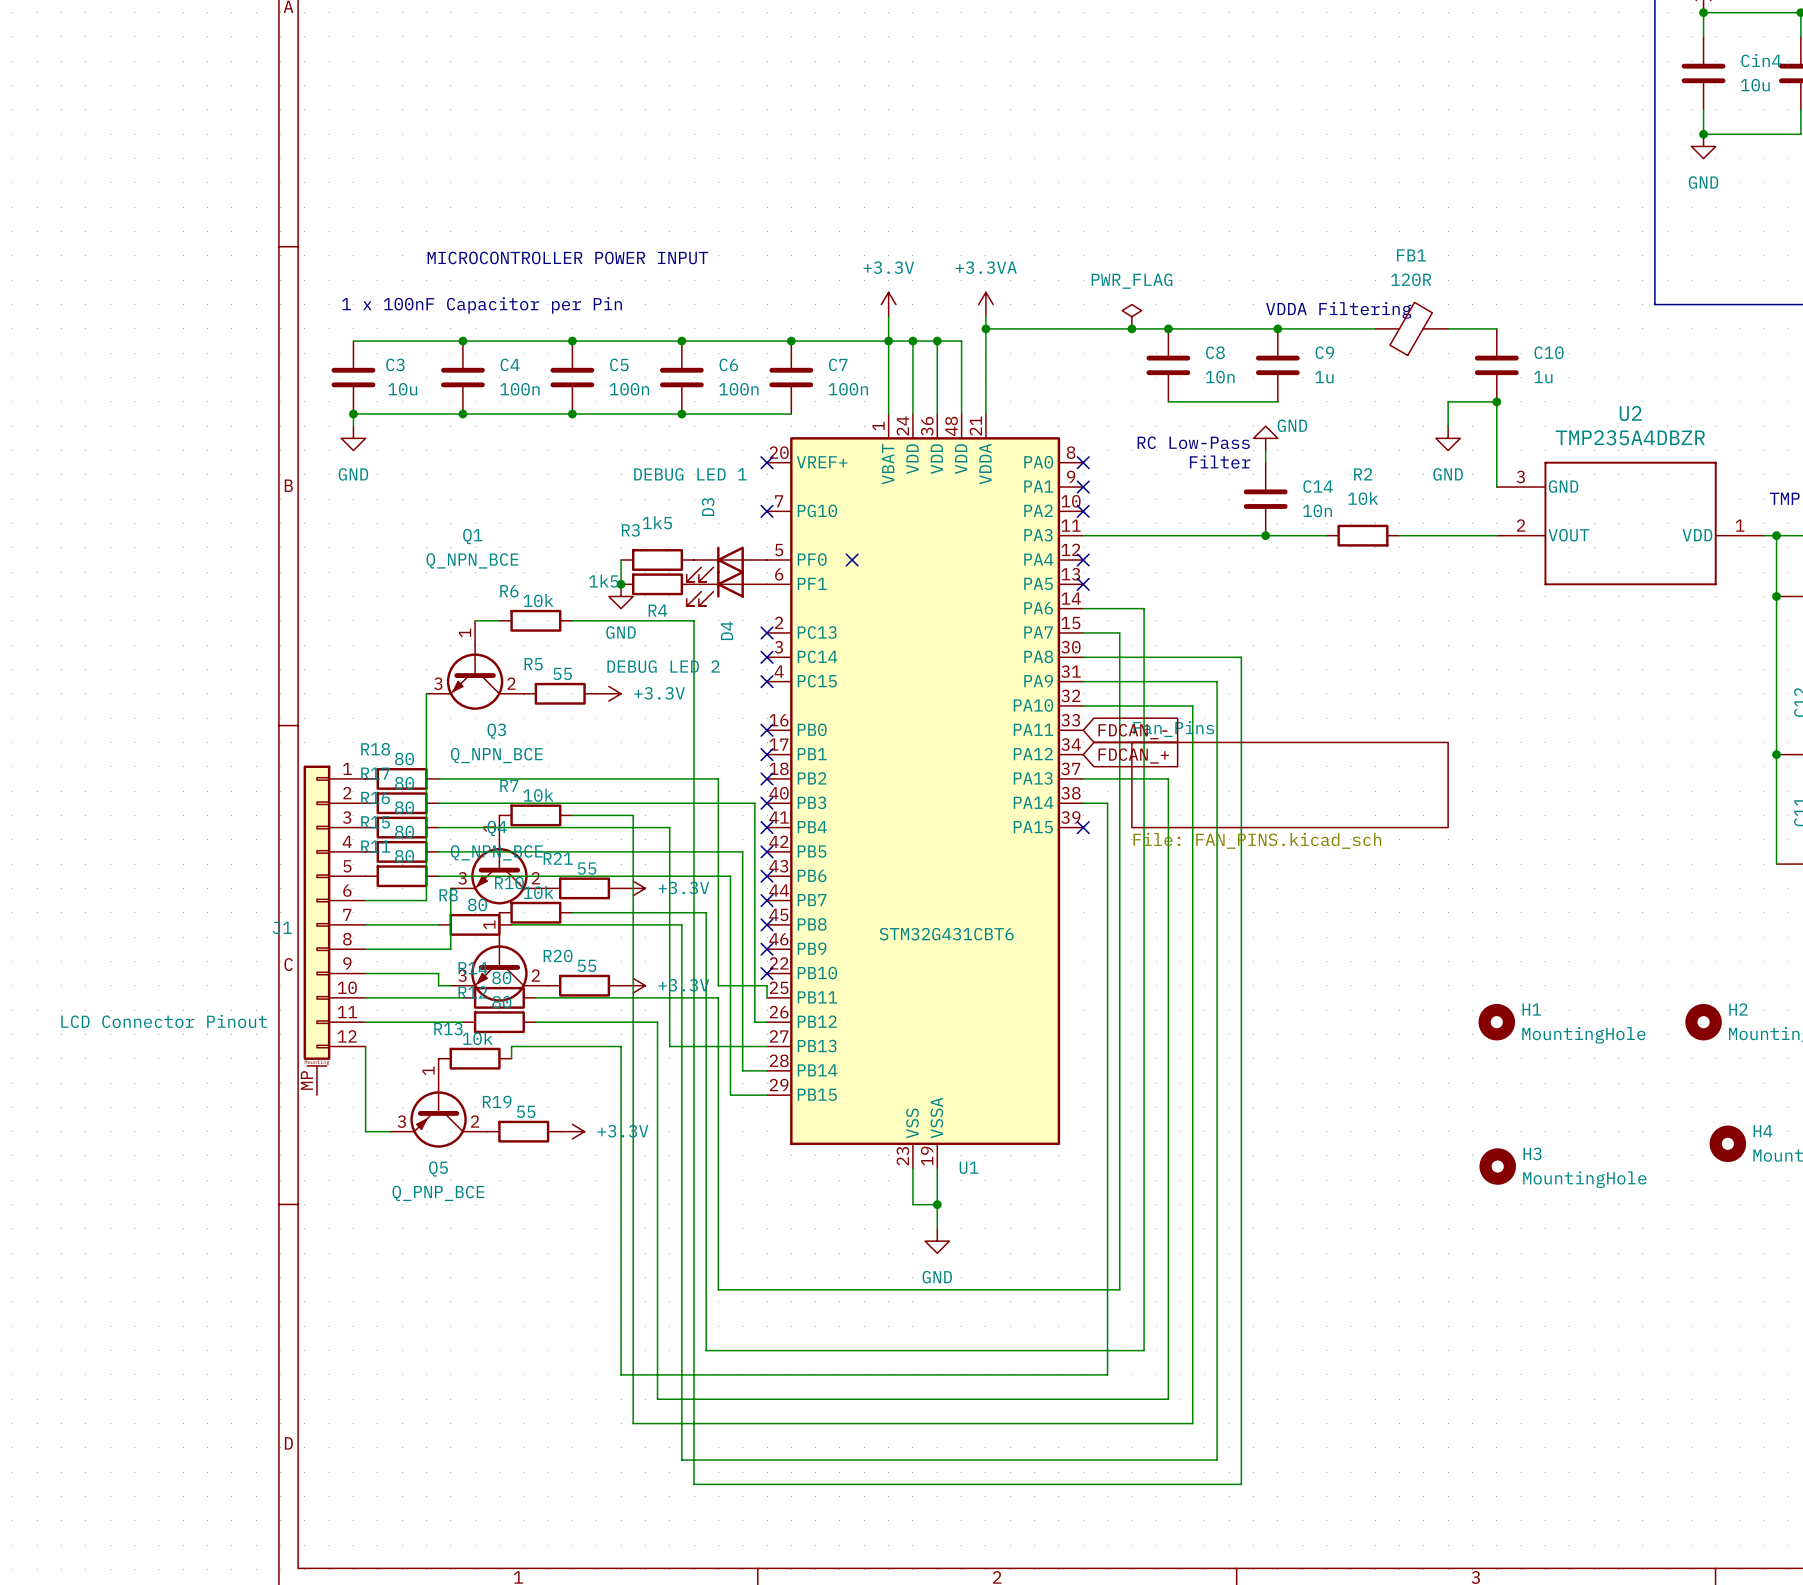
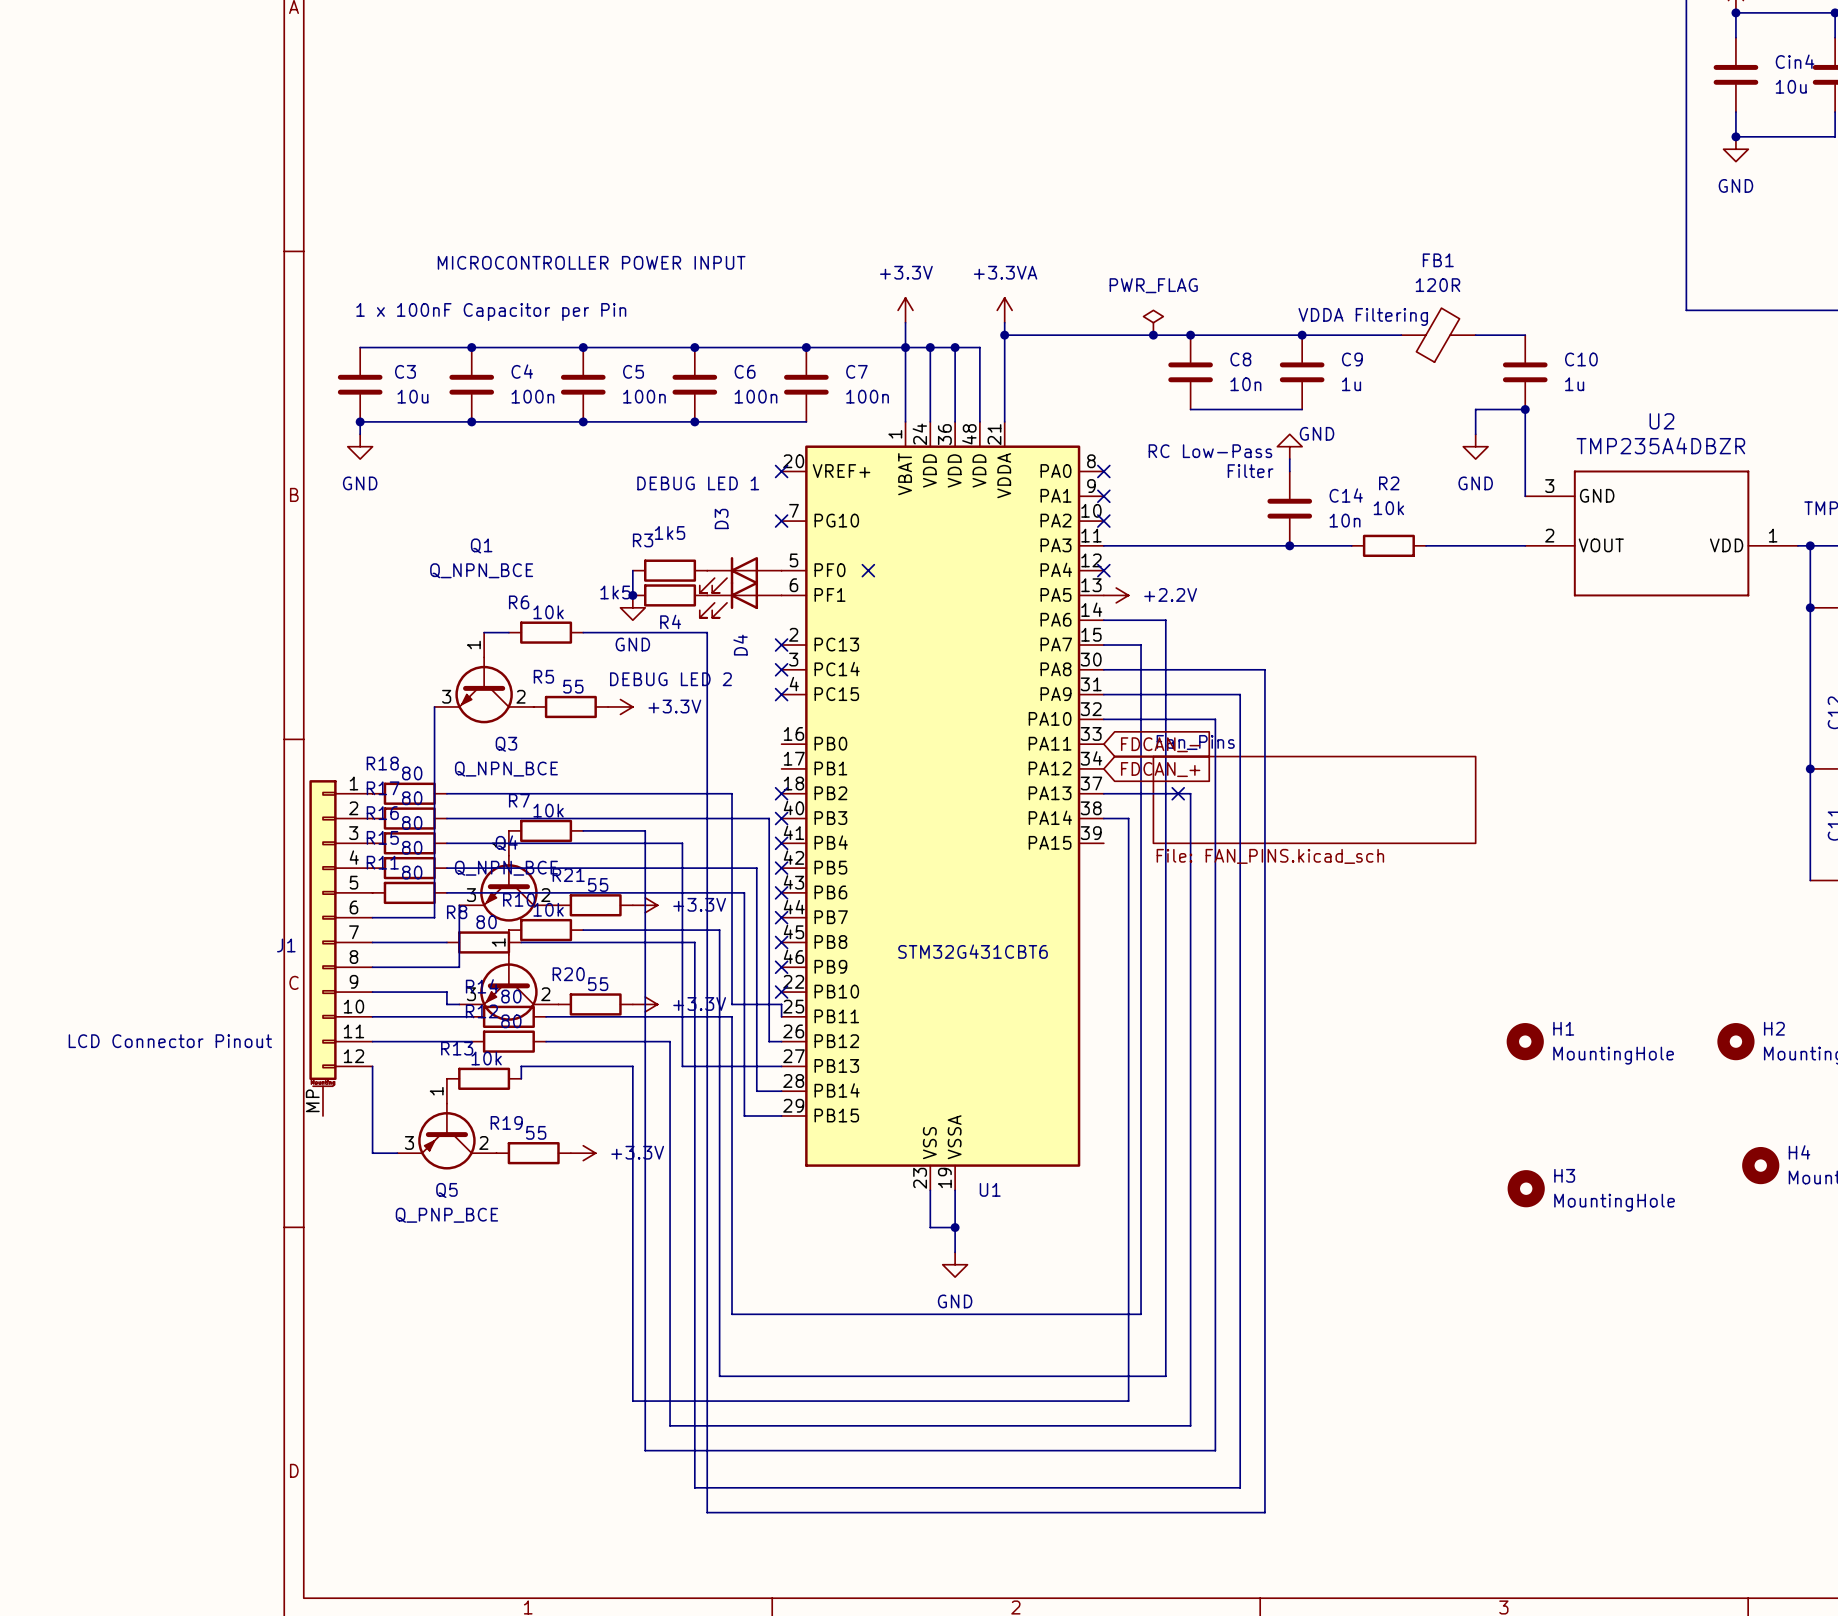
no-connect mark: (1083, 584) -> none
power symbol: none -> +2.2V (1116, 595)
no-connect mark: (767, 730) -> none
no-connect mark: (767, 754) -> none
no-connect mark: none -> (1178, 793)
no-connect mark: (1083, 827) -> none

